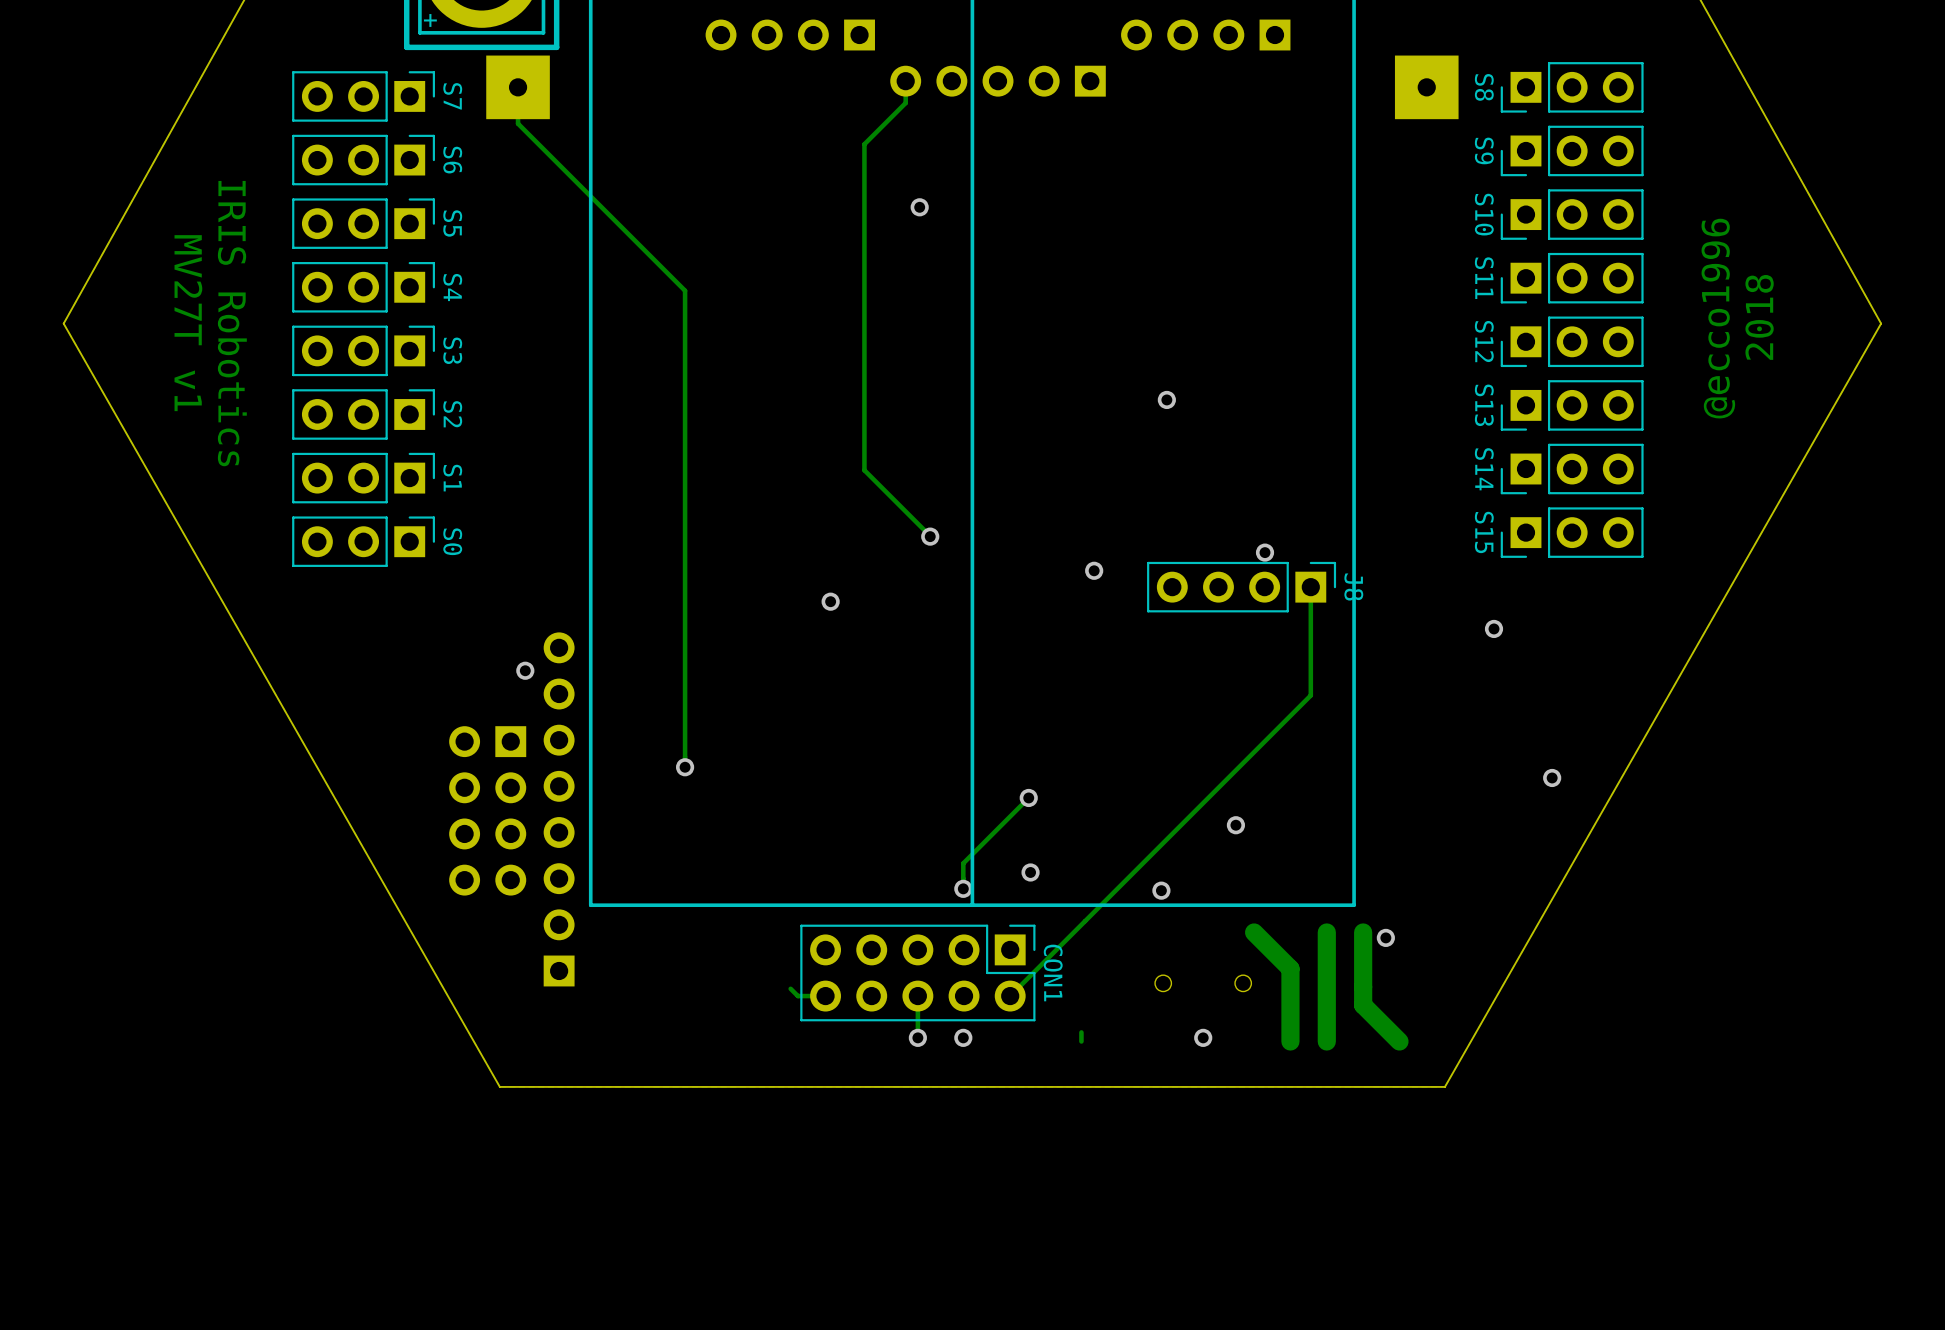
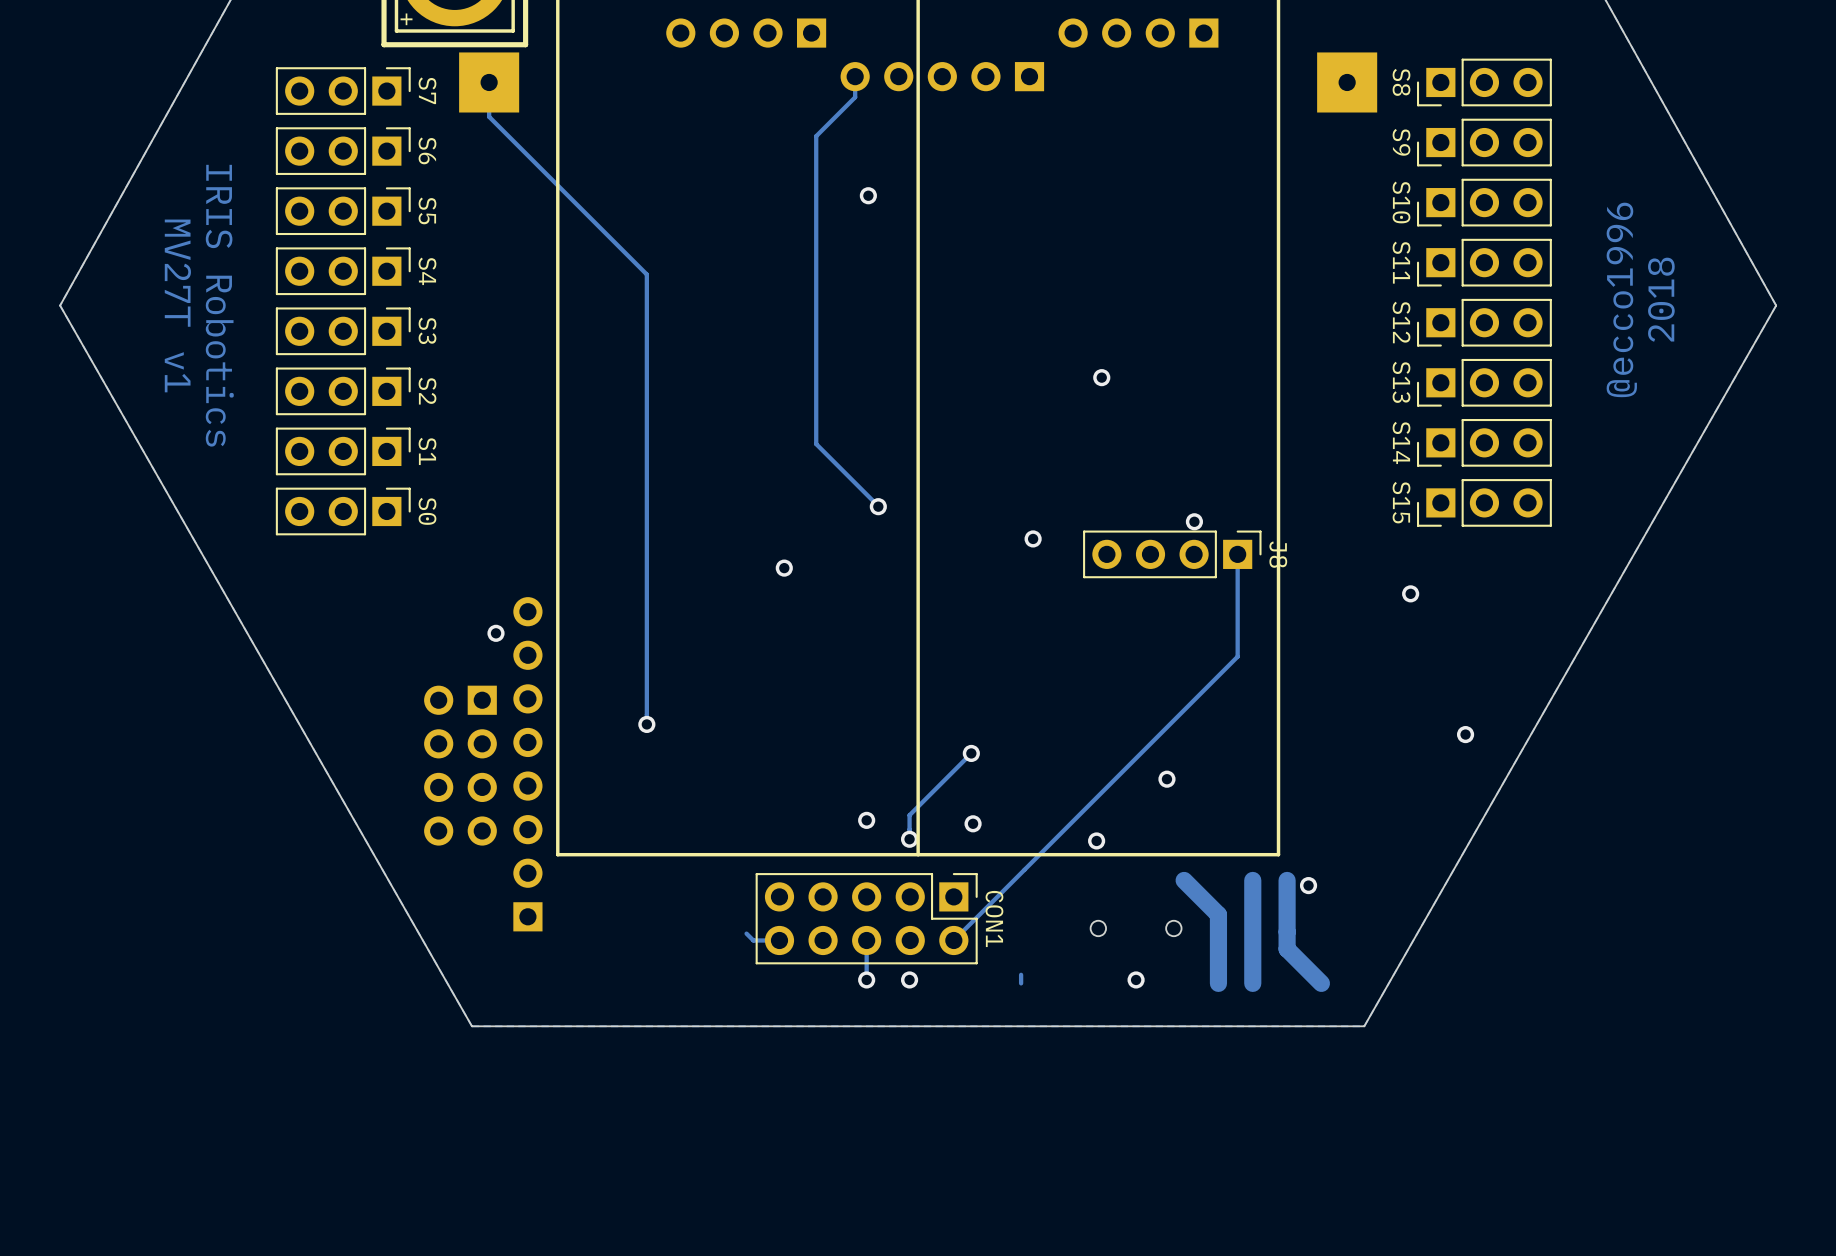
via: none -> (866, 820)

